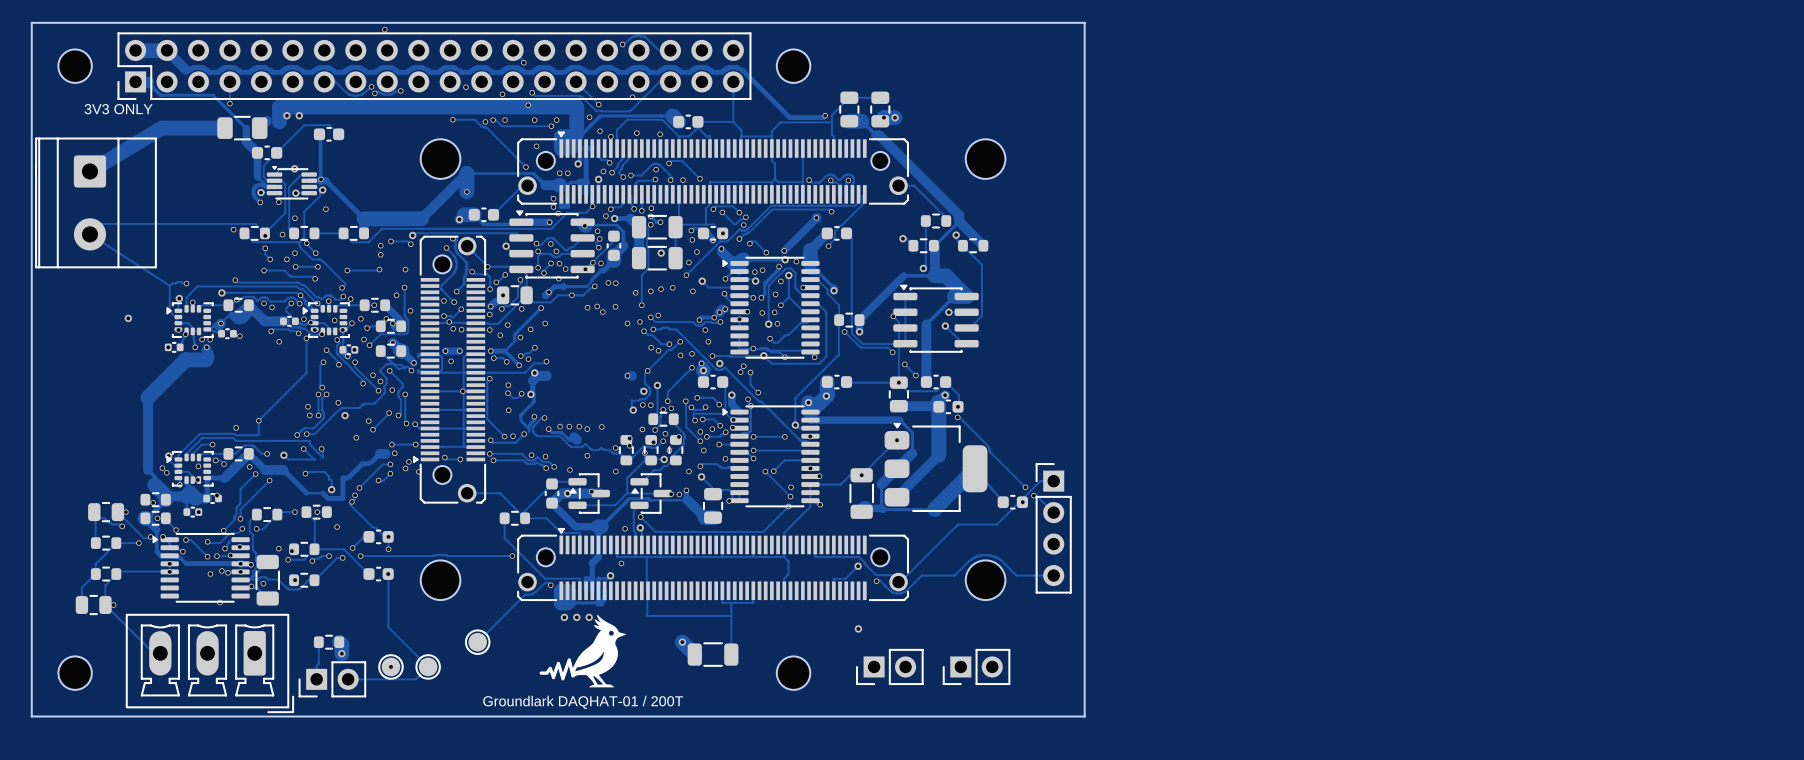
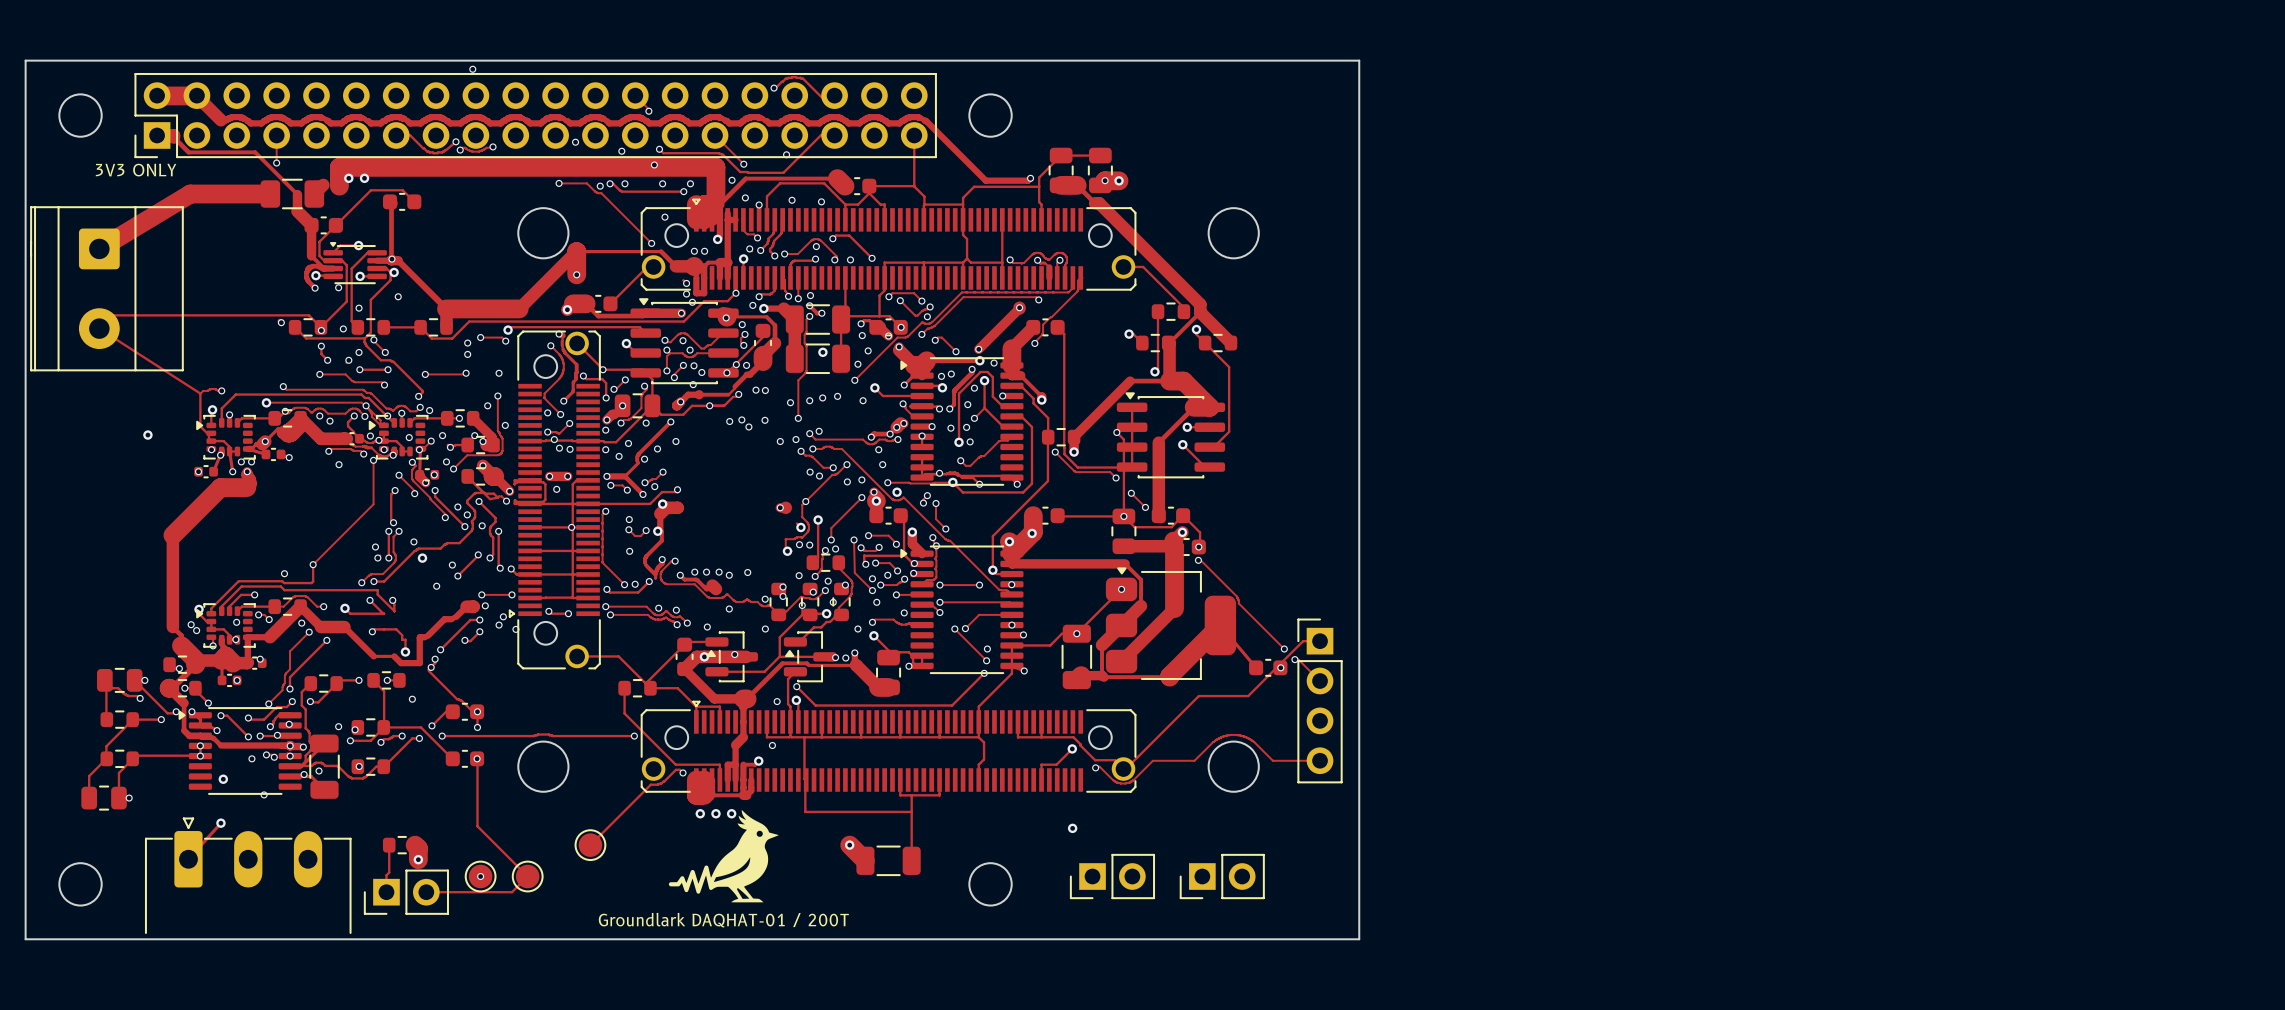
via: none -> (223, 779)
track: (105, 605) (153, 653) (160, 653) -> (220, 823) (188, 859)
part footprint: [126, 614, 294, 713] -> [145, 817, 352, 934]
via: none -> (220, 823)

